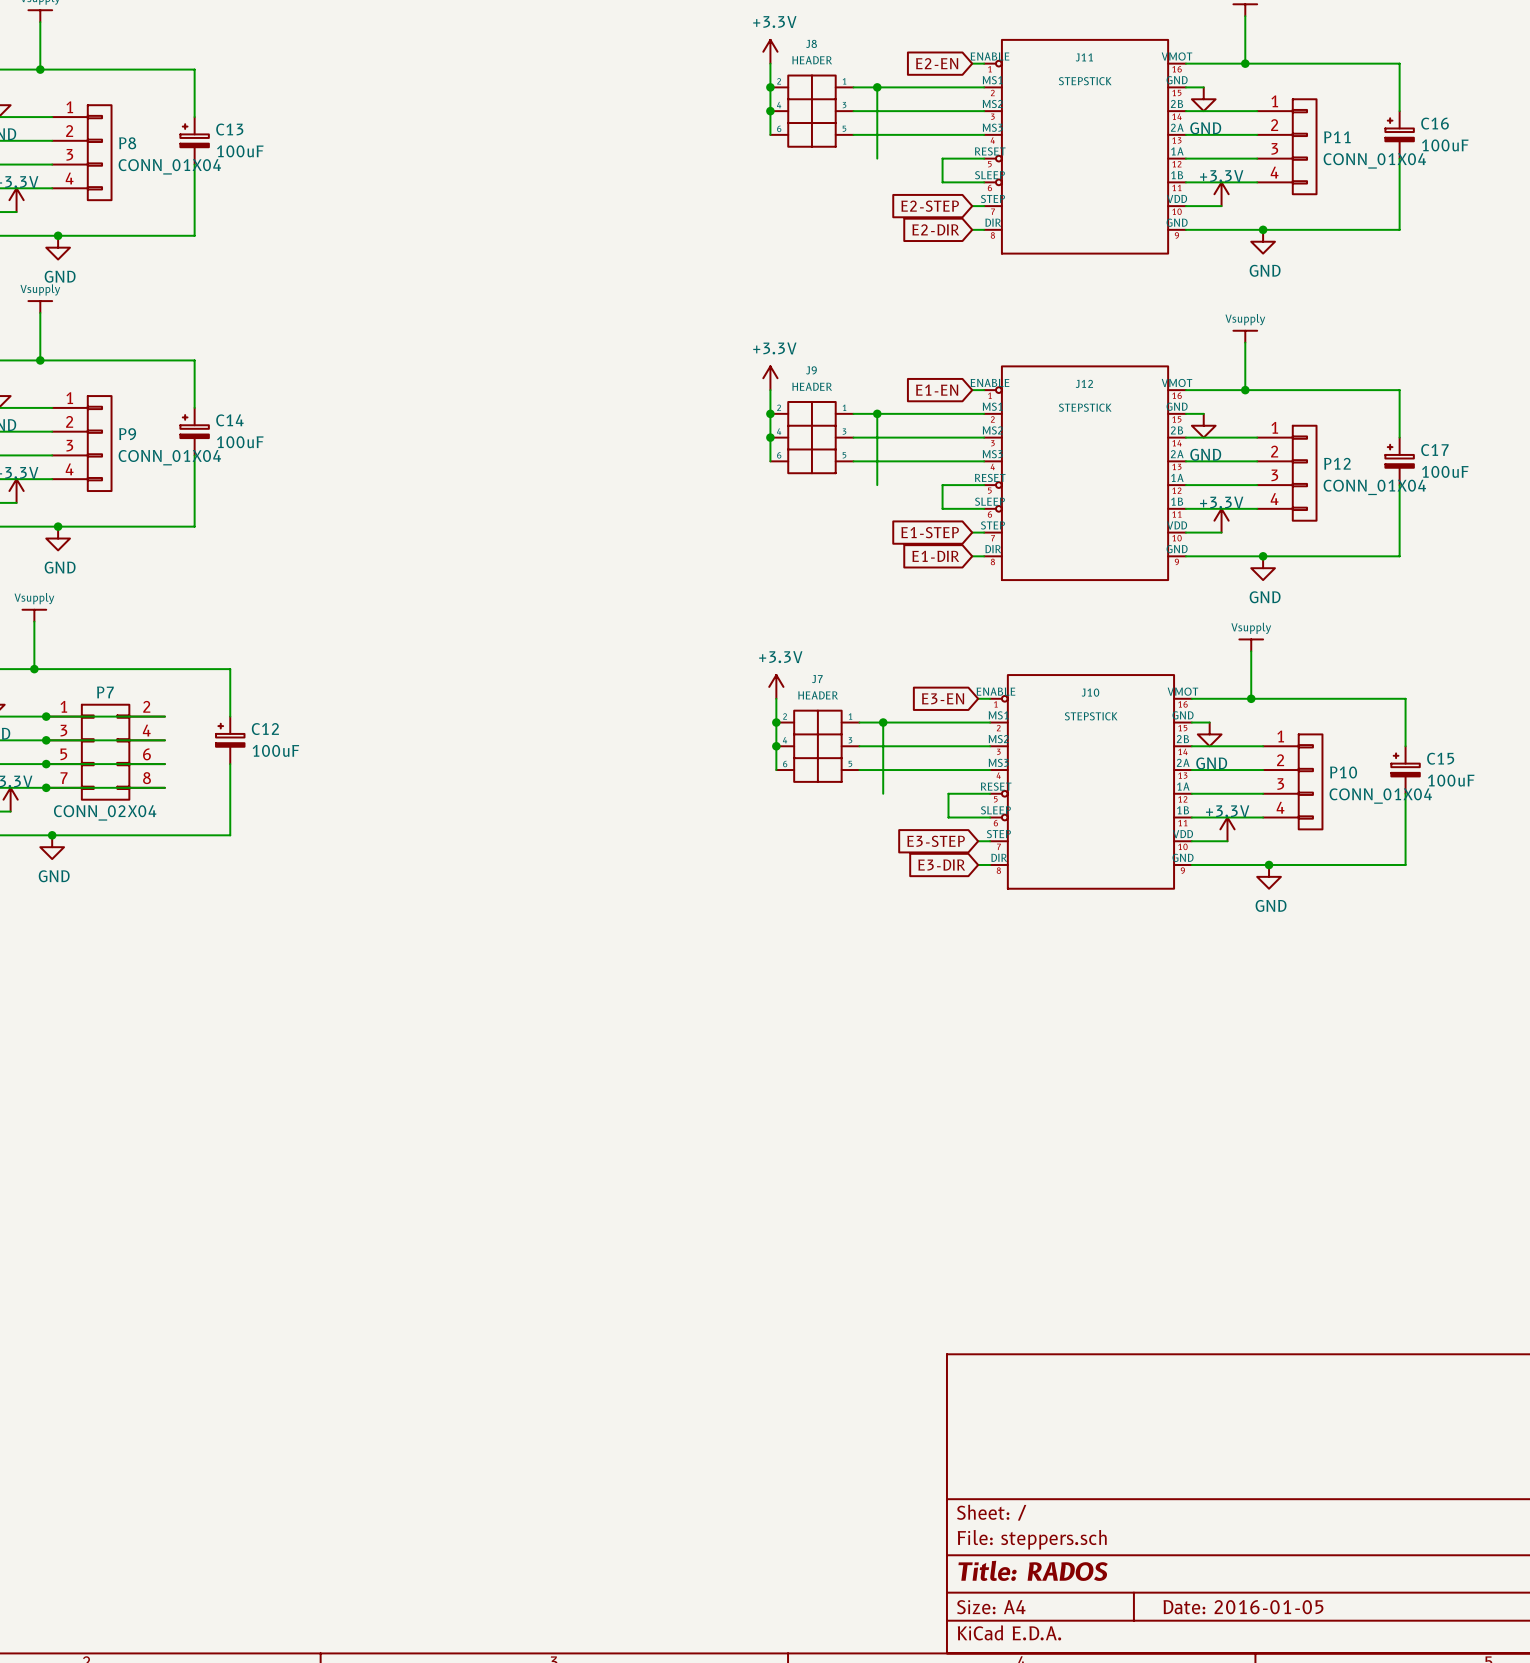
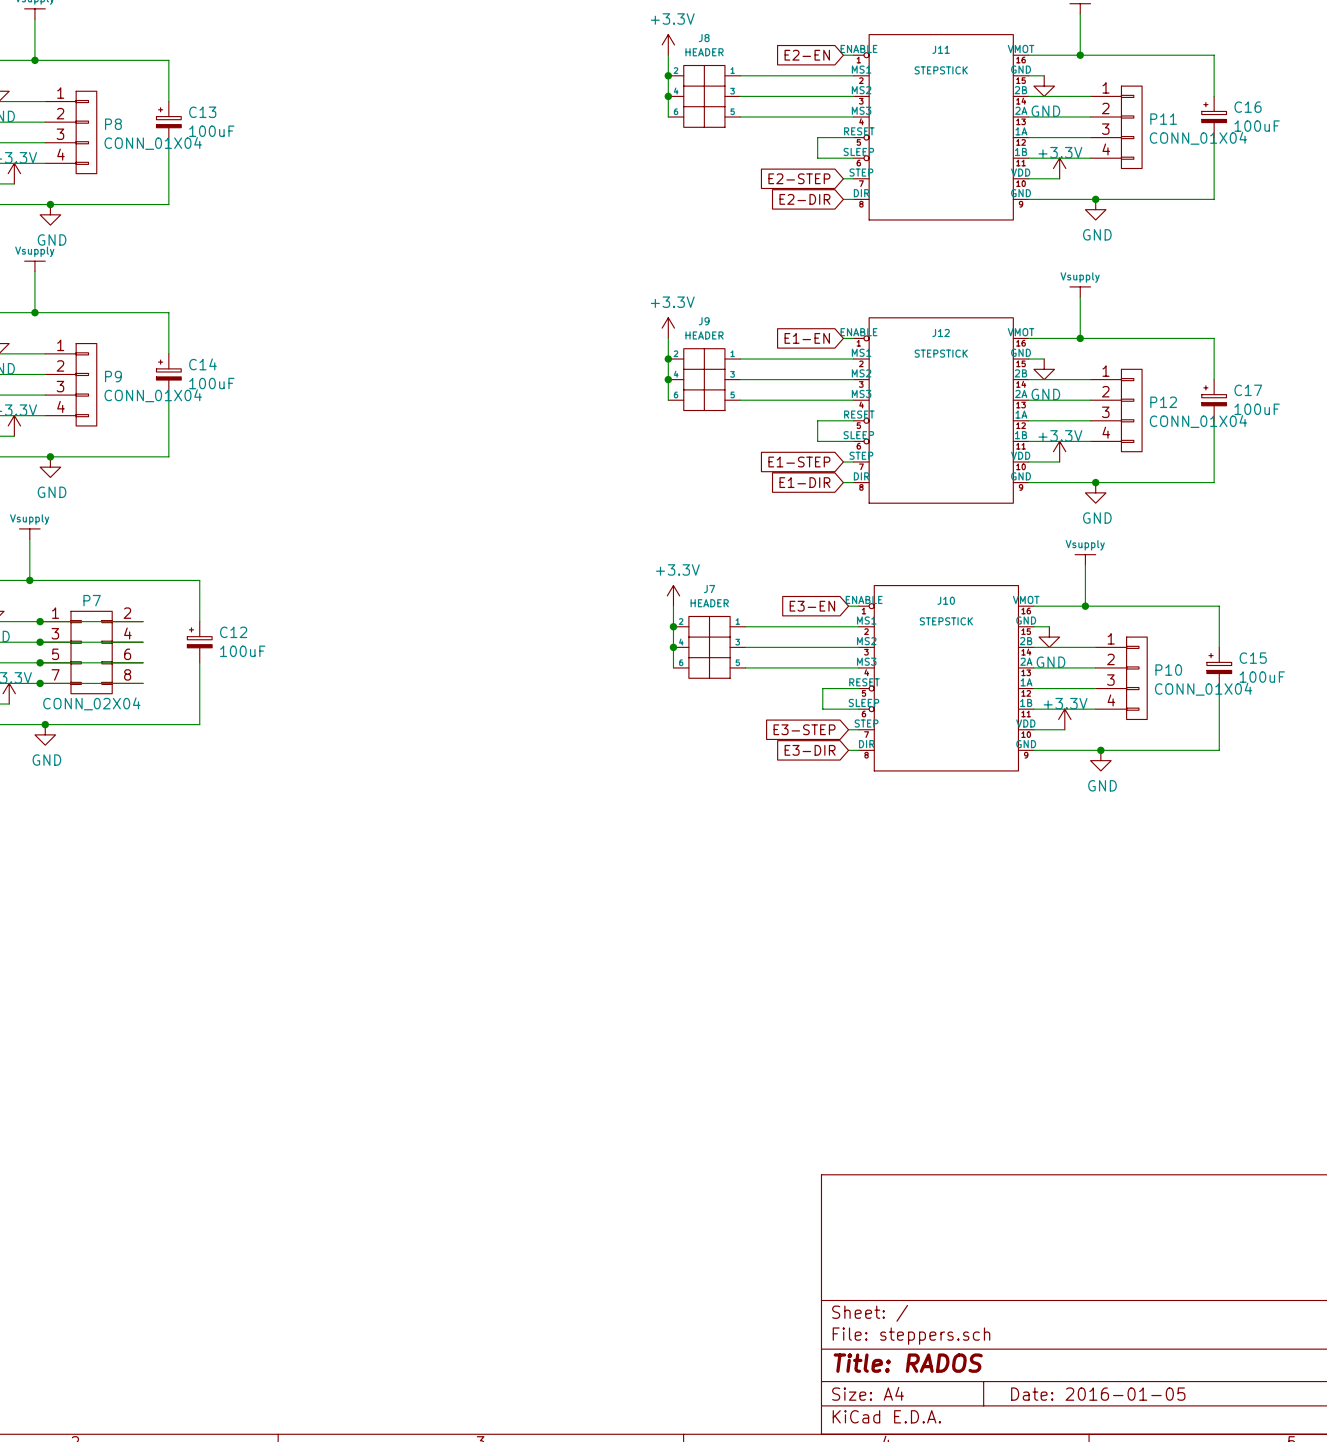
wire: (877, 87) (877, 158) -> none
junction: (877, 87) -> none
wire: (877, 413) (877, 485) -> none
junction: (877, 413) -> none
wire: (883, 722) (883, 793) -> none
junction: (883, 722) -> none

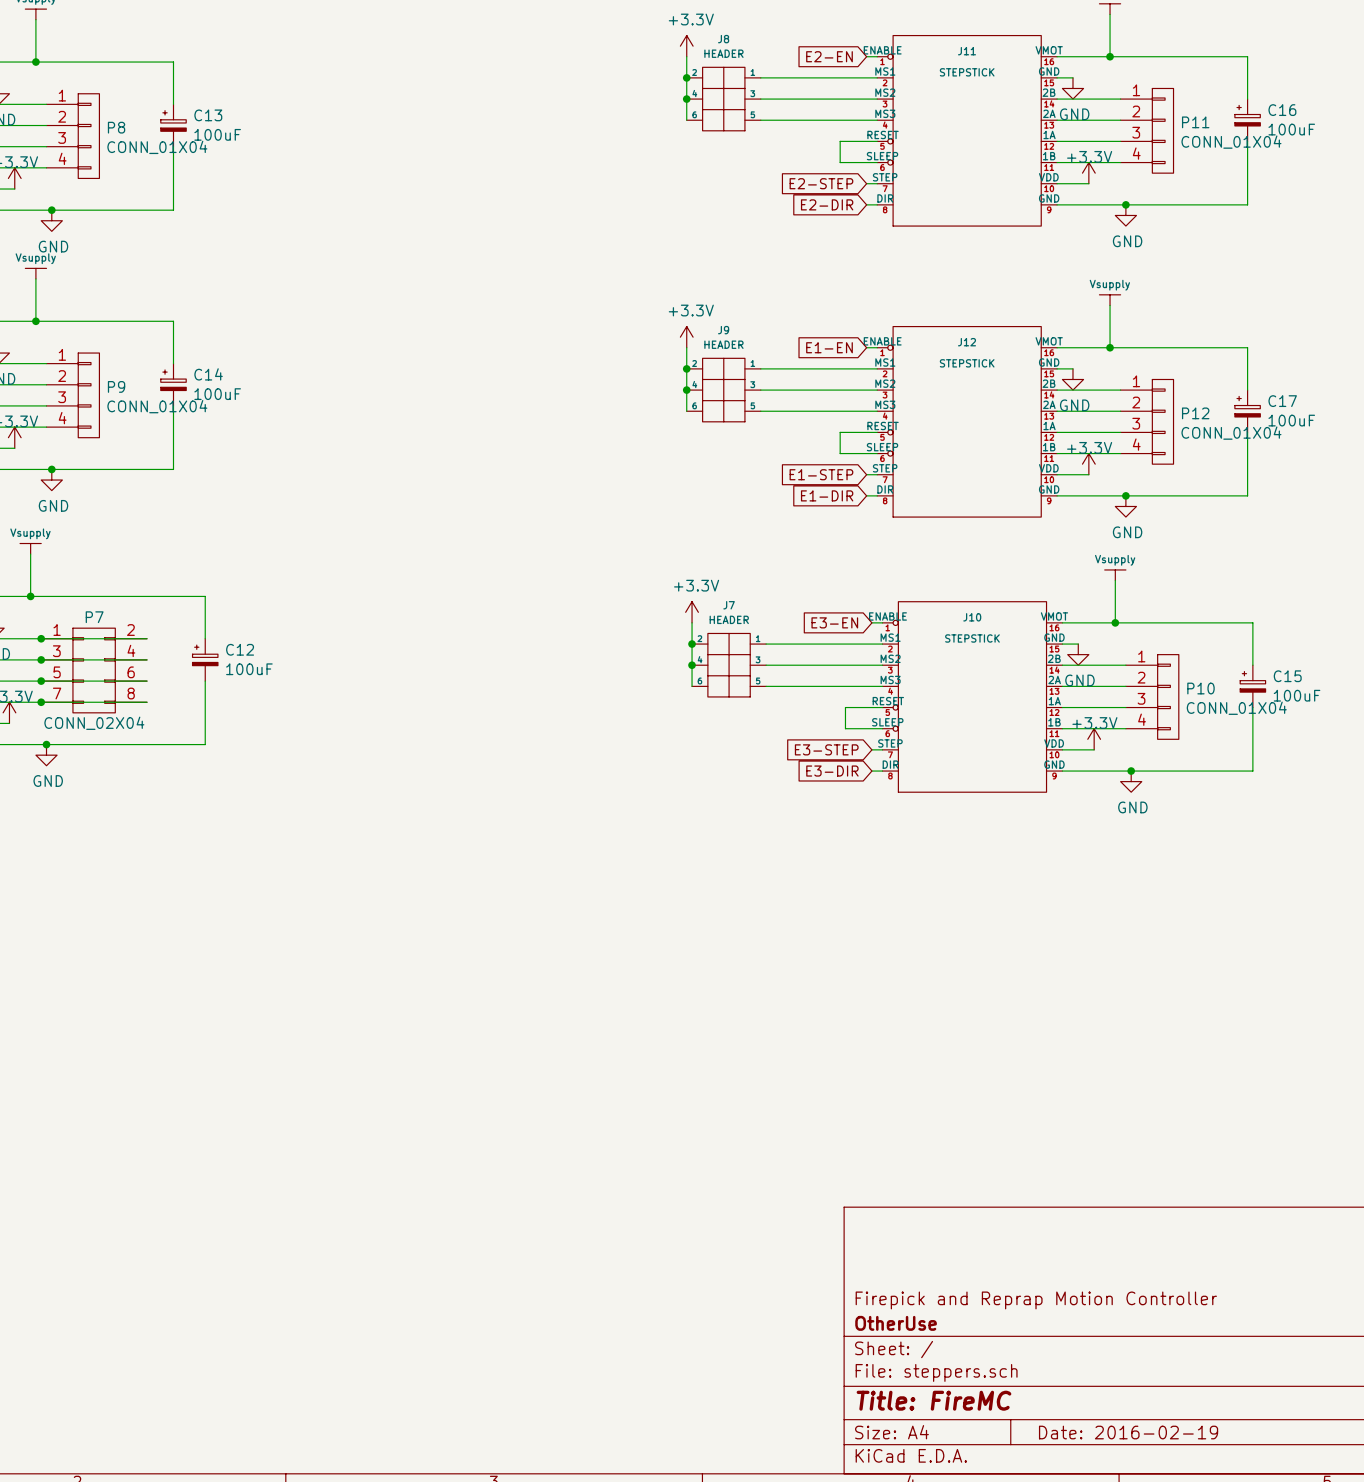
title block: none -> Firepick and Reprap Motion Controller (1036, 1300)
title block: none -> OtherUse (896, 1323)
title block: Title: RADOS (908, 1363) -> Title: FireMC (933, 1400)
title block: Date: 2016-01-05 (1098, 1394) -> Date: 2016-02-19 (1128, 1432)

